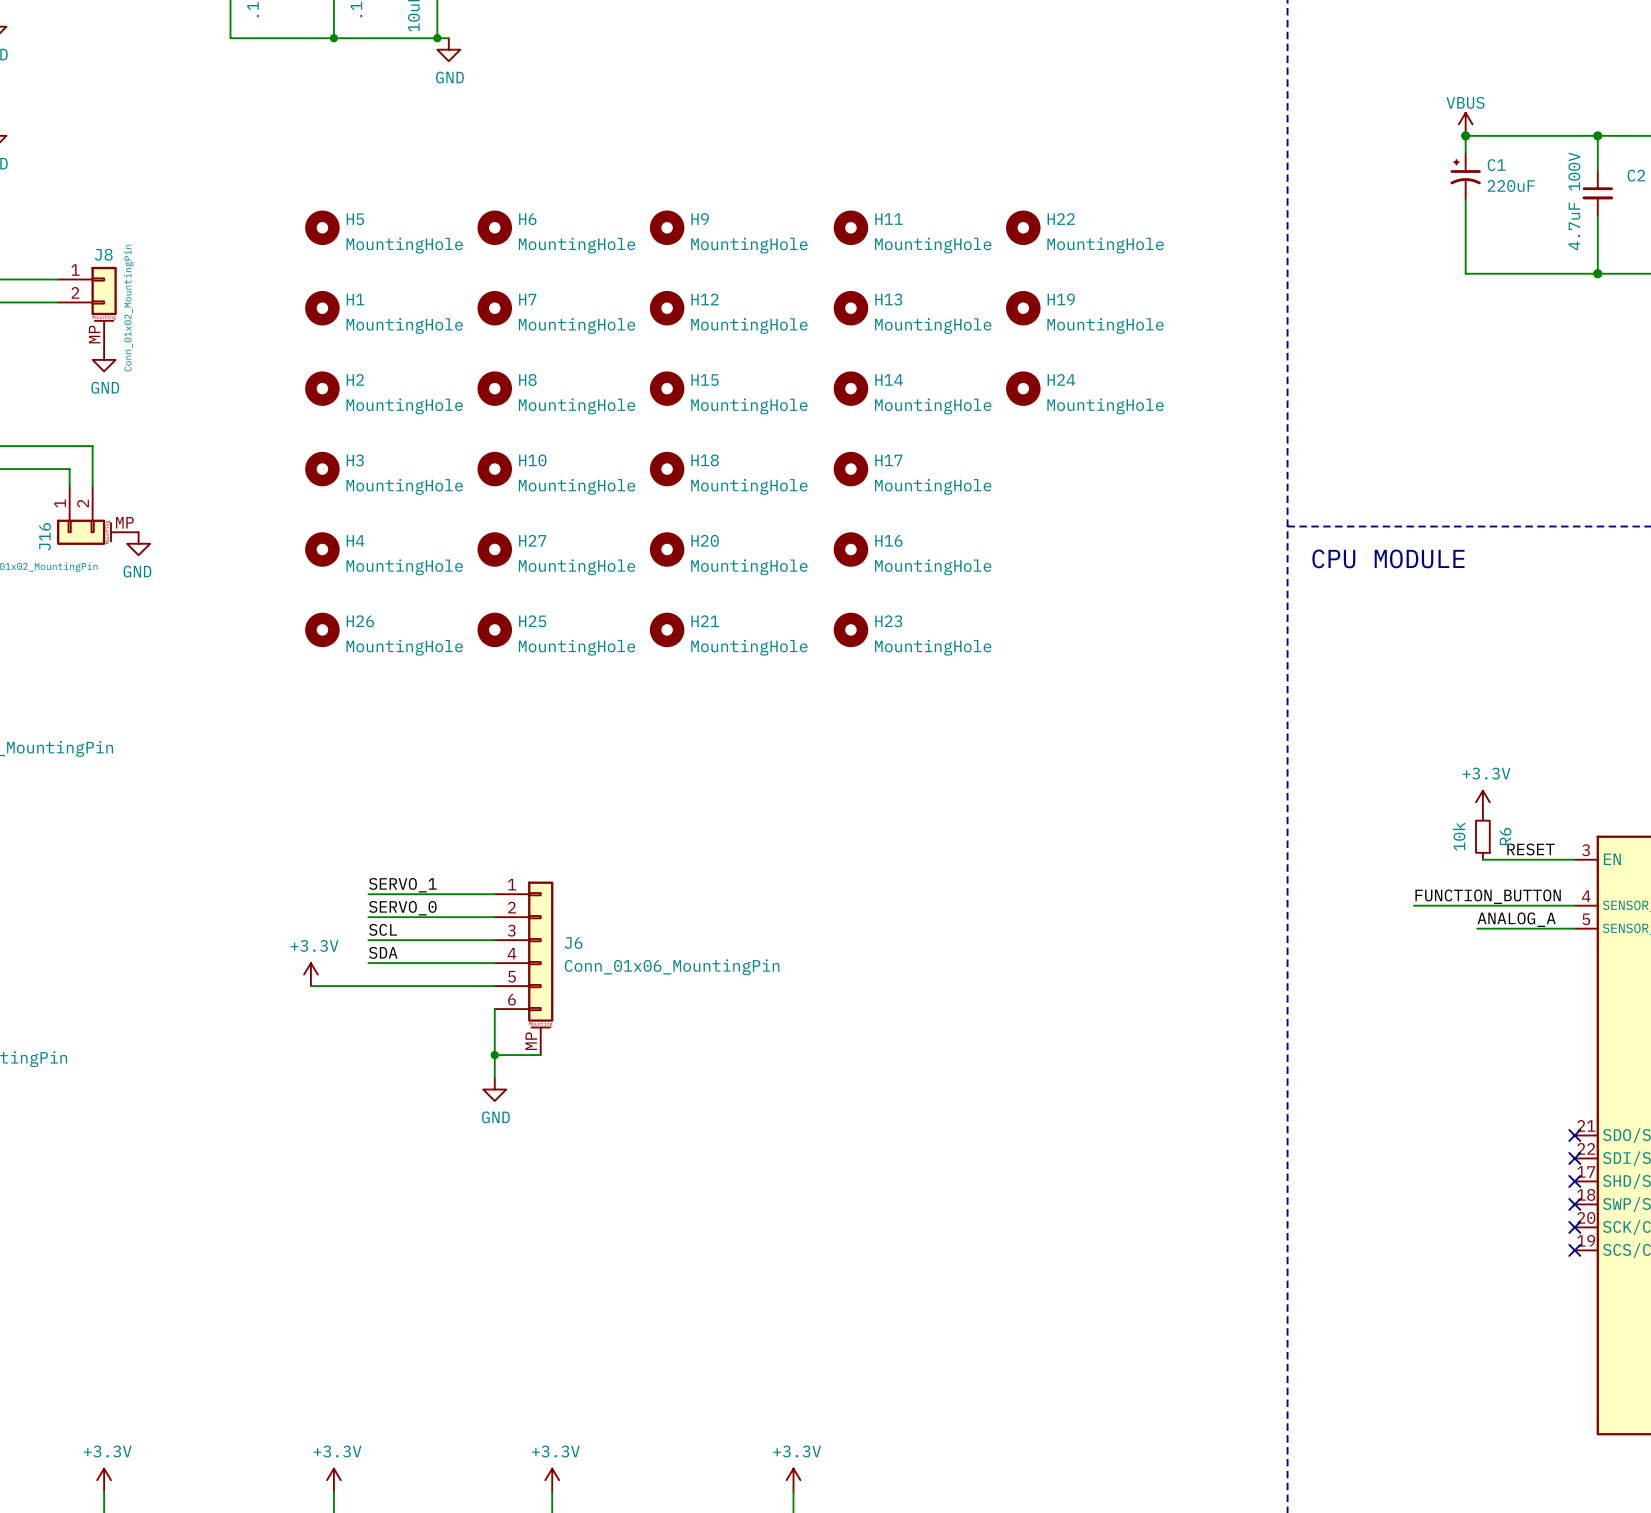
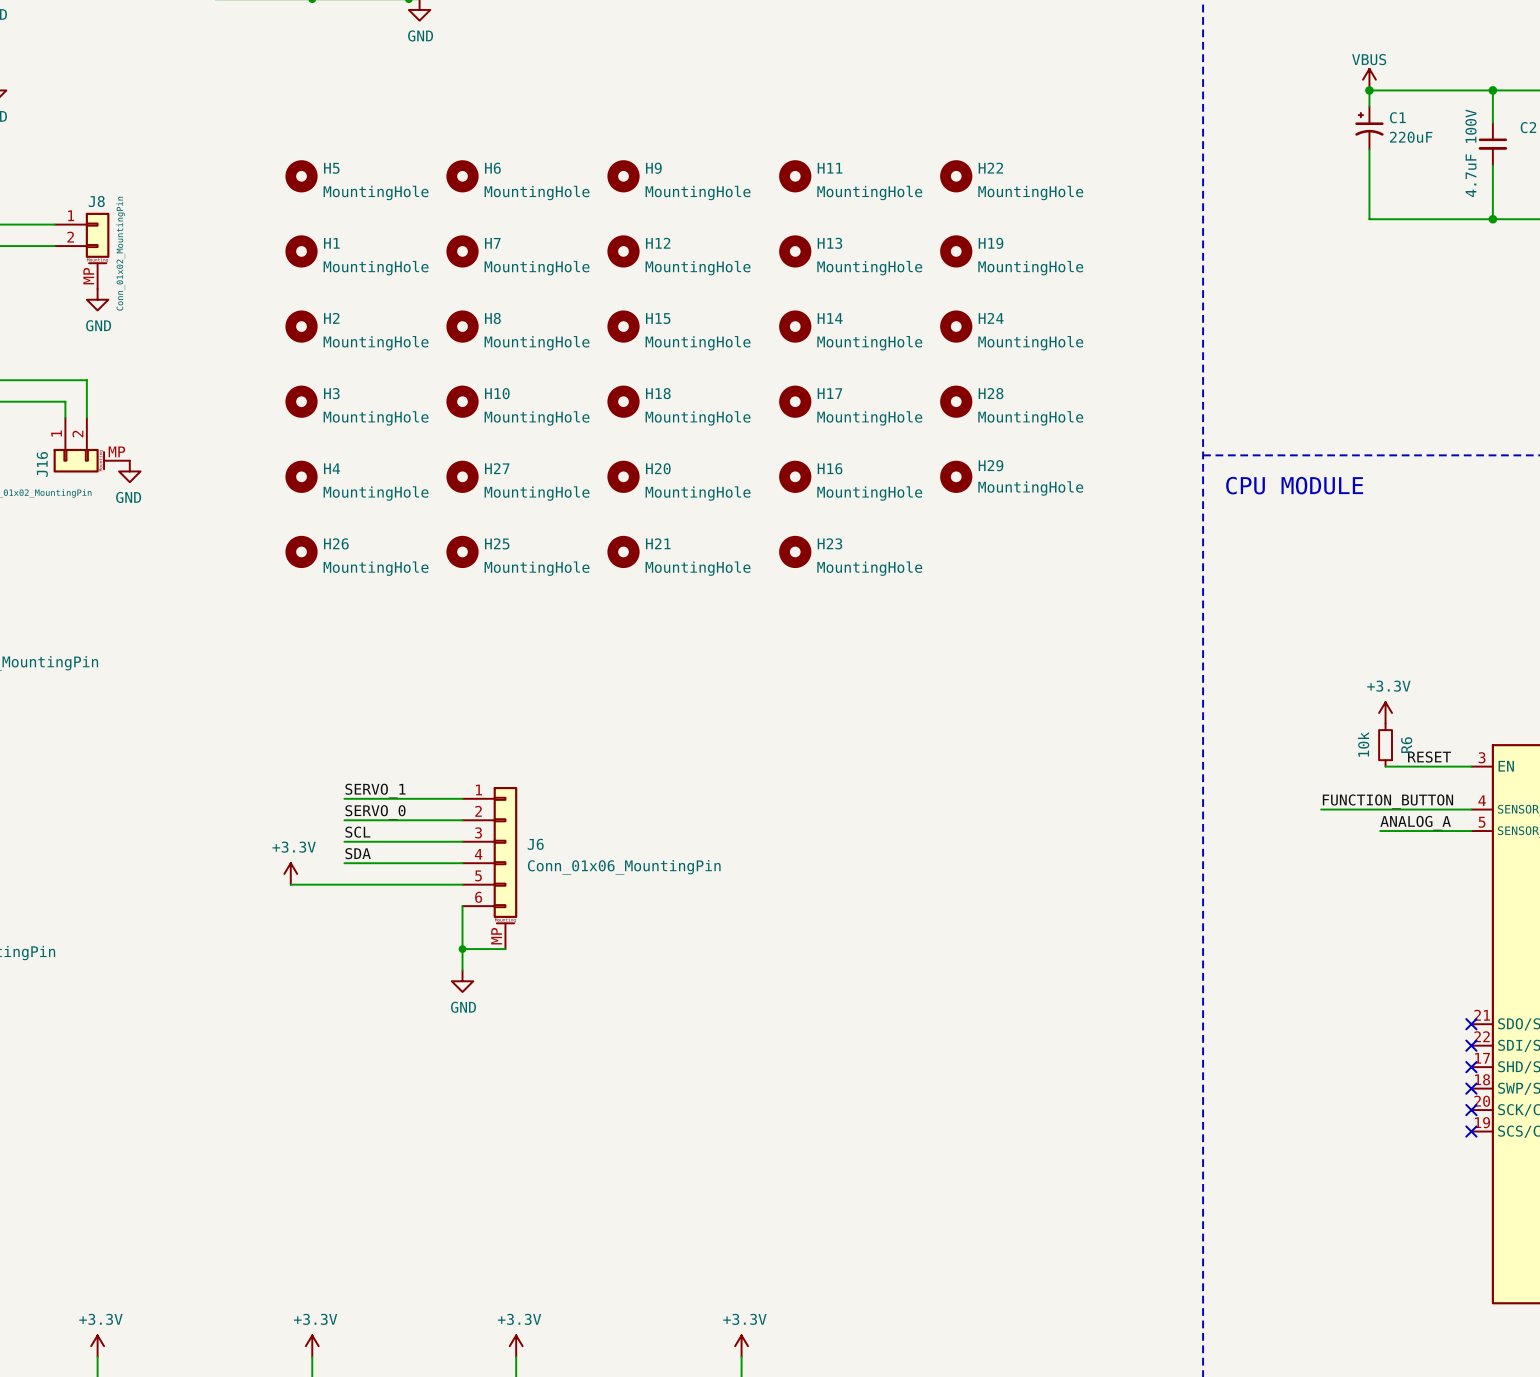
H28: none -> MountingHole (956, 401)
H29: none -> MountingHole (956, 476)

